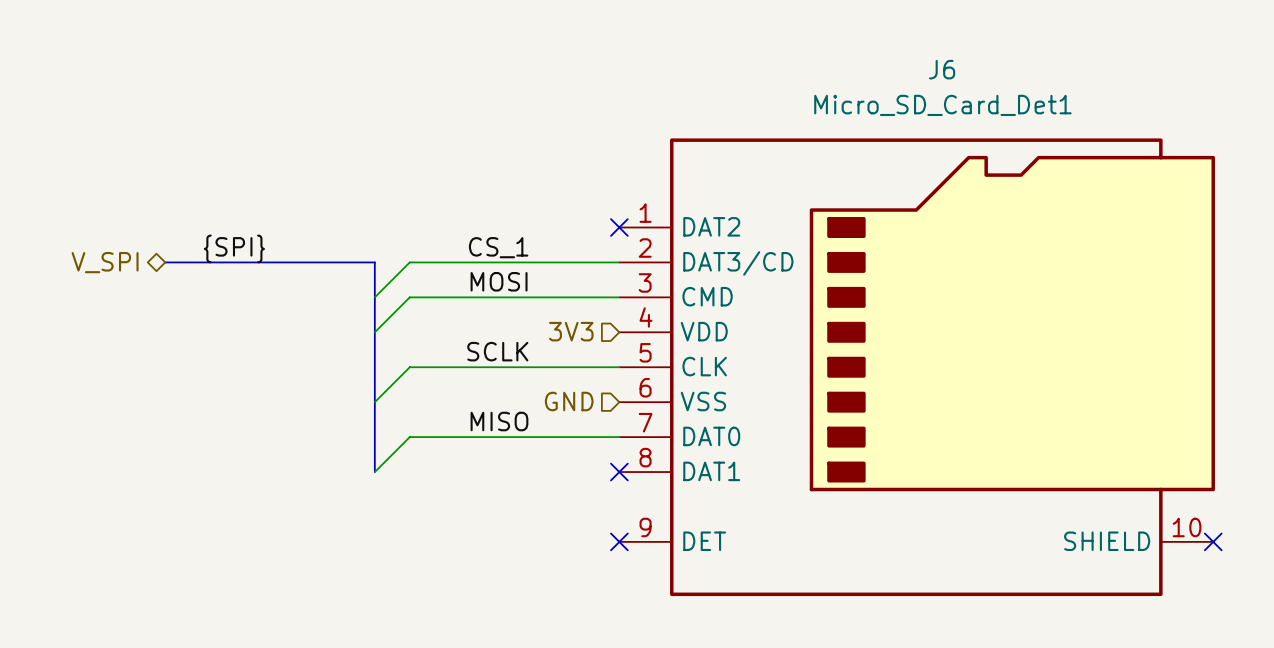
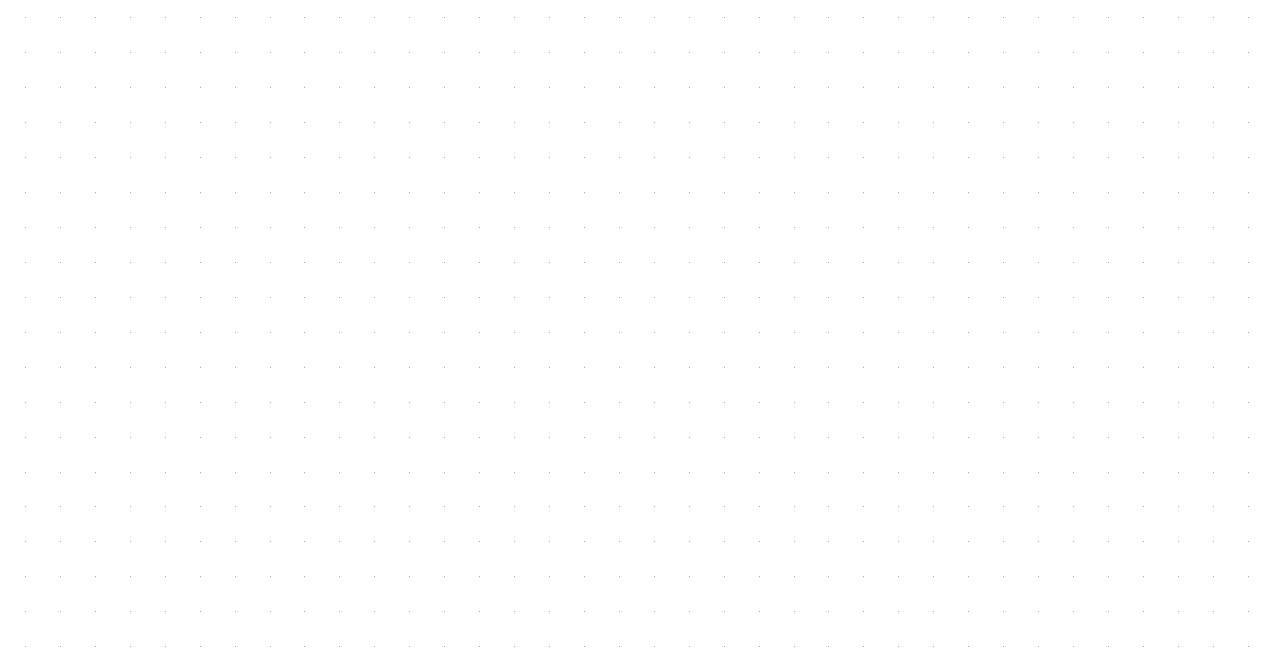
no-connect mark: (619, 227) -> none
label: CS_1 (498, 247) -> none
label: {SPI} (234, 248) -> none
hierarchical label: V_SPI (105, 262) -> none
bus: (165, 262) (374, 262) (374, 472) -> none
wire: (619, 262) (409, 262) (374, 297) -> none
label: MOSI (499, 281) -> none
wire: (619, 297) (409, 297) (374, 332) -> none
hierarchical label: 3V3 (571, 331) -> none
label: SCLK (497, 351) -> none
wire: (619, 367) (409, 367) (374, 402) -> none
J6: Micro_SD_Card_Det1 (917, 367) -> none
hierarchical label: GND (569, 401) -> none
label: MISO (499, 421) -> none
wire: (619, 437) (409, 437) (374, 472) -> none
no-connect mark: (619, 472) -> none
no-connect mark: (619, 541) -> none
no-connect mark: (1213, 541) -> none

